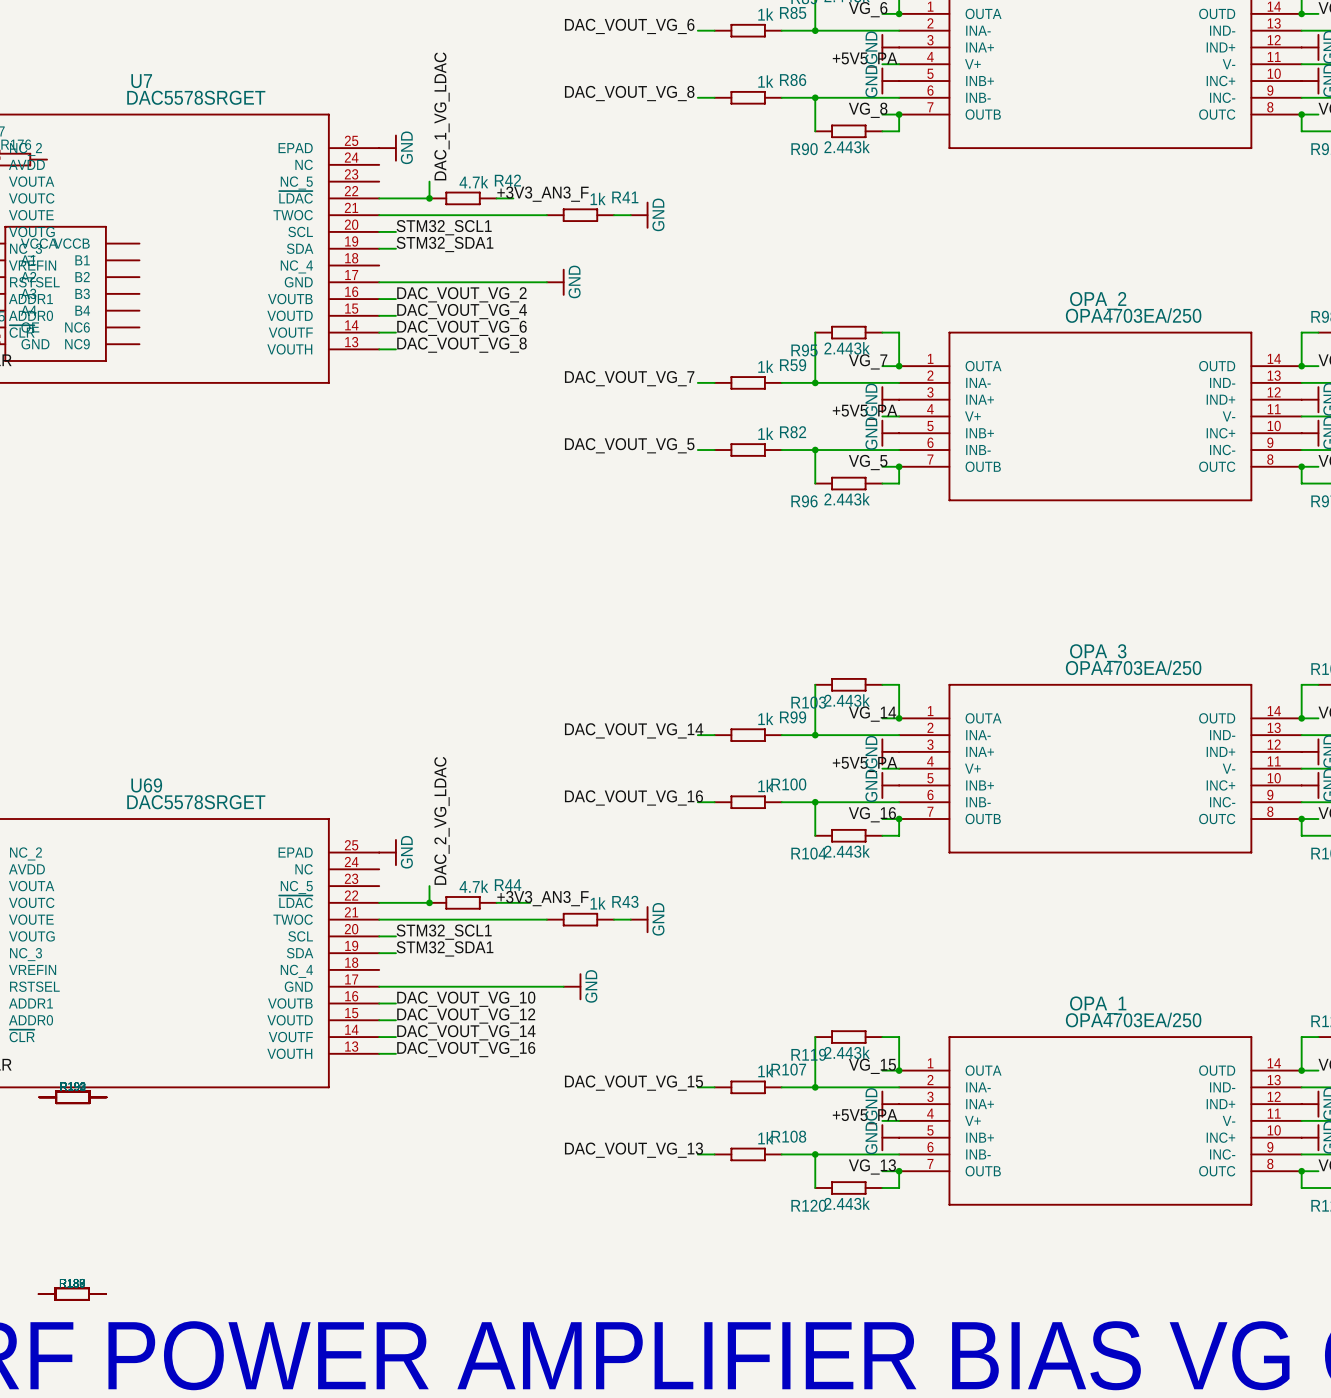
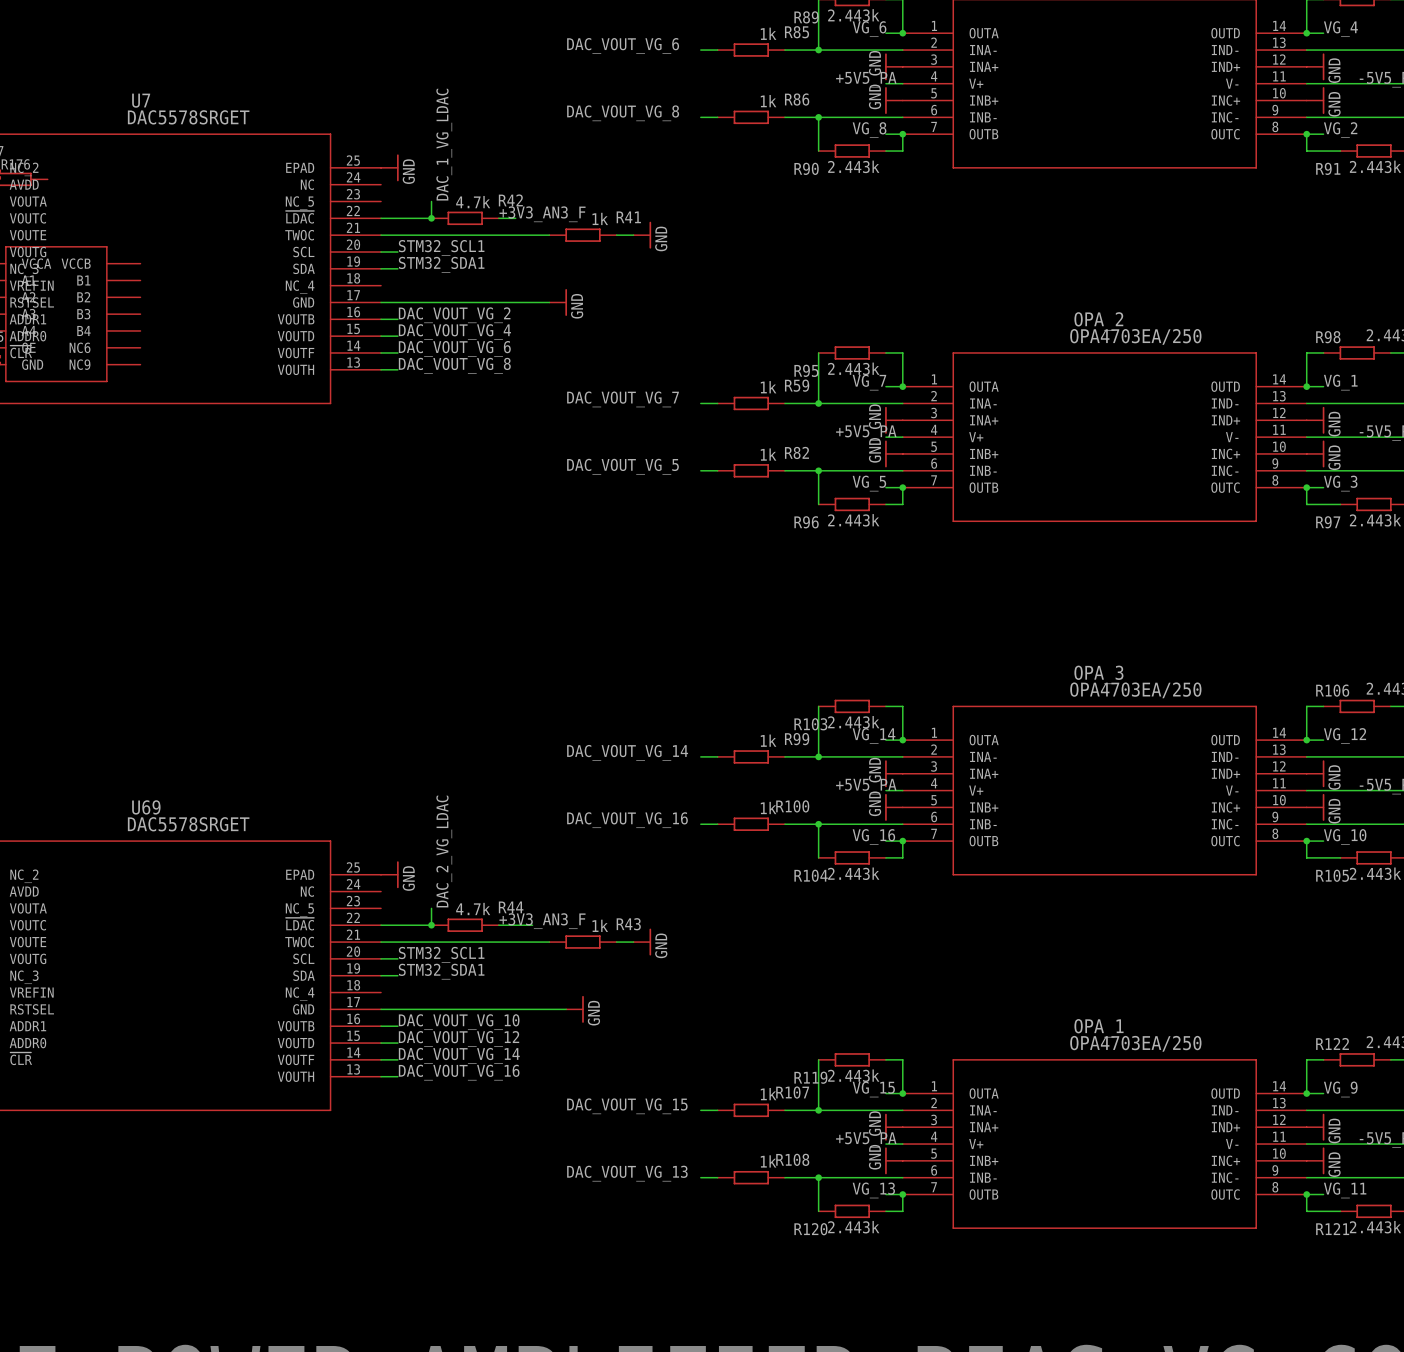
part: (72, 1097) -> none
part: (72, 1097) -> none
part: (72, 1097) -> none
part: (72, 1097) -> none
part: (72, 1294) -> none
part: (72, 1294) -> none
part: (72, 1294) -> none
part: (72, 1294) -> none

